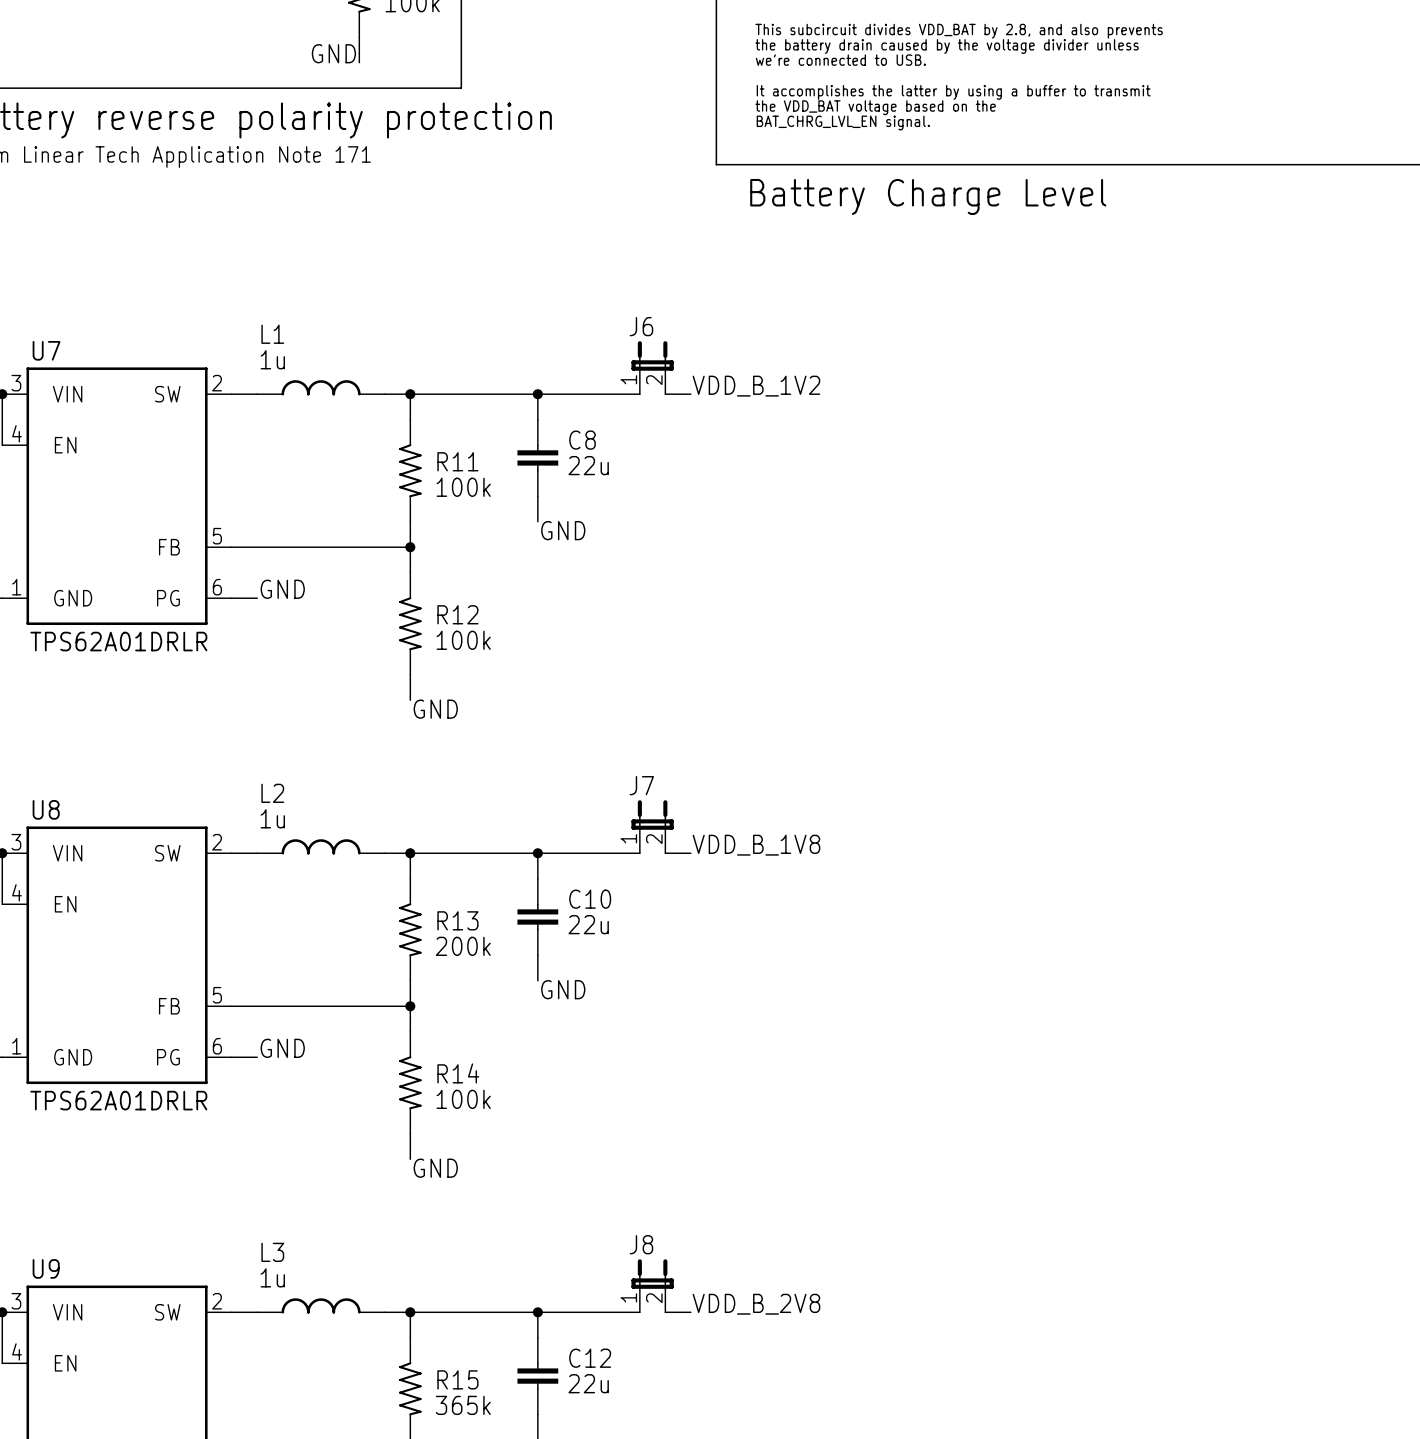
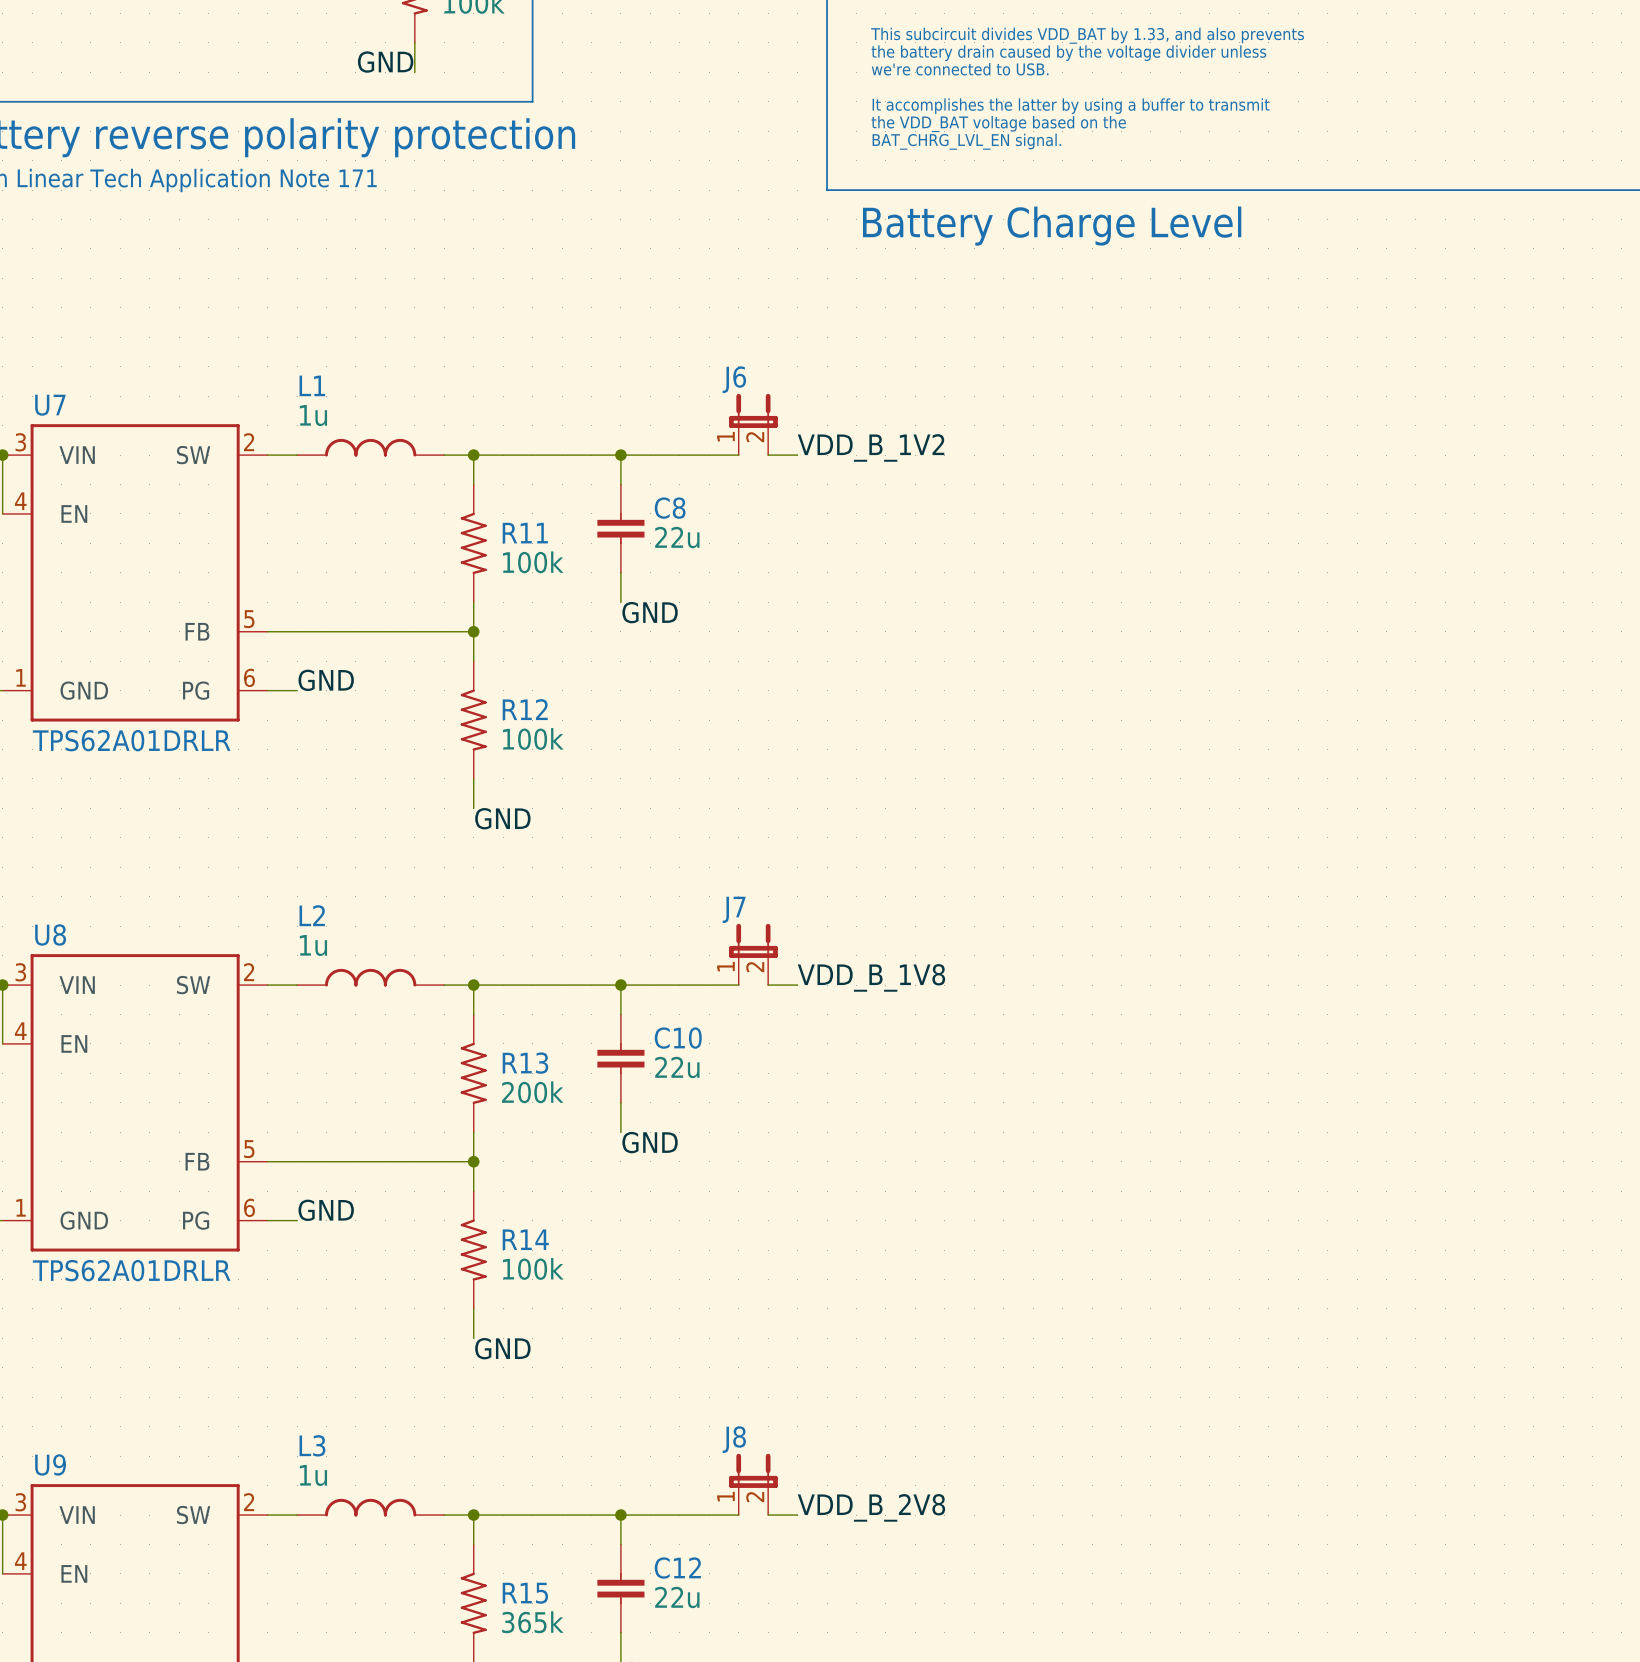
text: This subcircuit divides VDD_BAT by 2.8, and also prevents (959, 31) -> This subcircuit divides VDD_BAT by 1.33, and also prevents (1087, 35)

